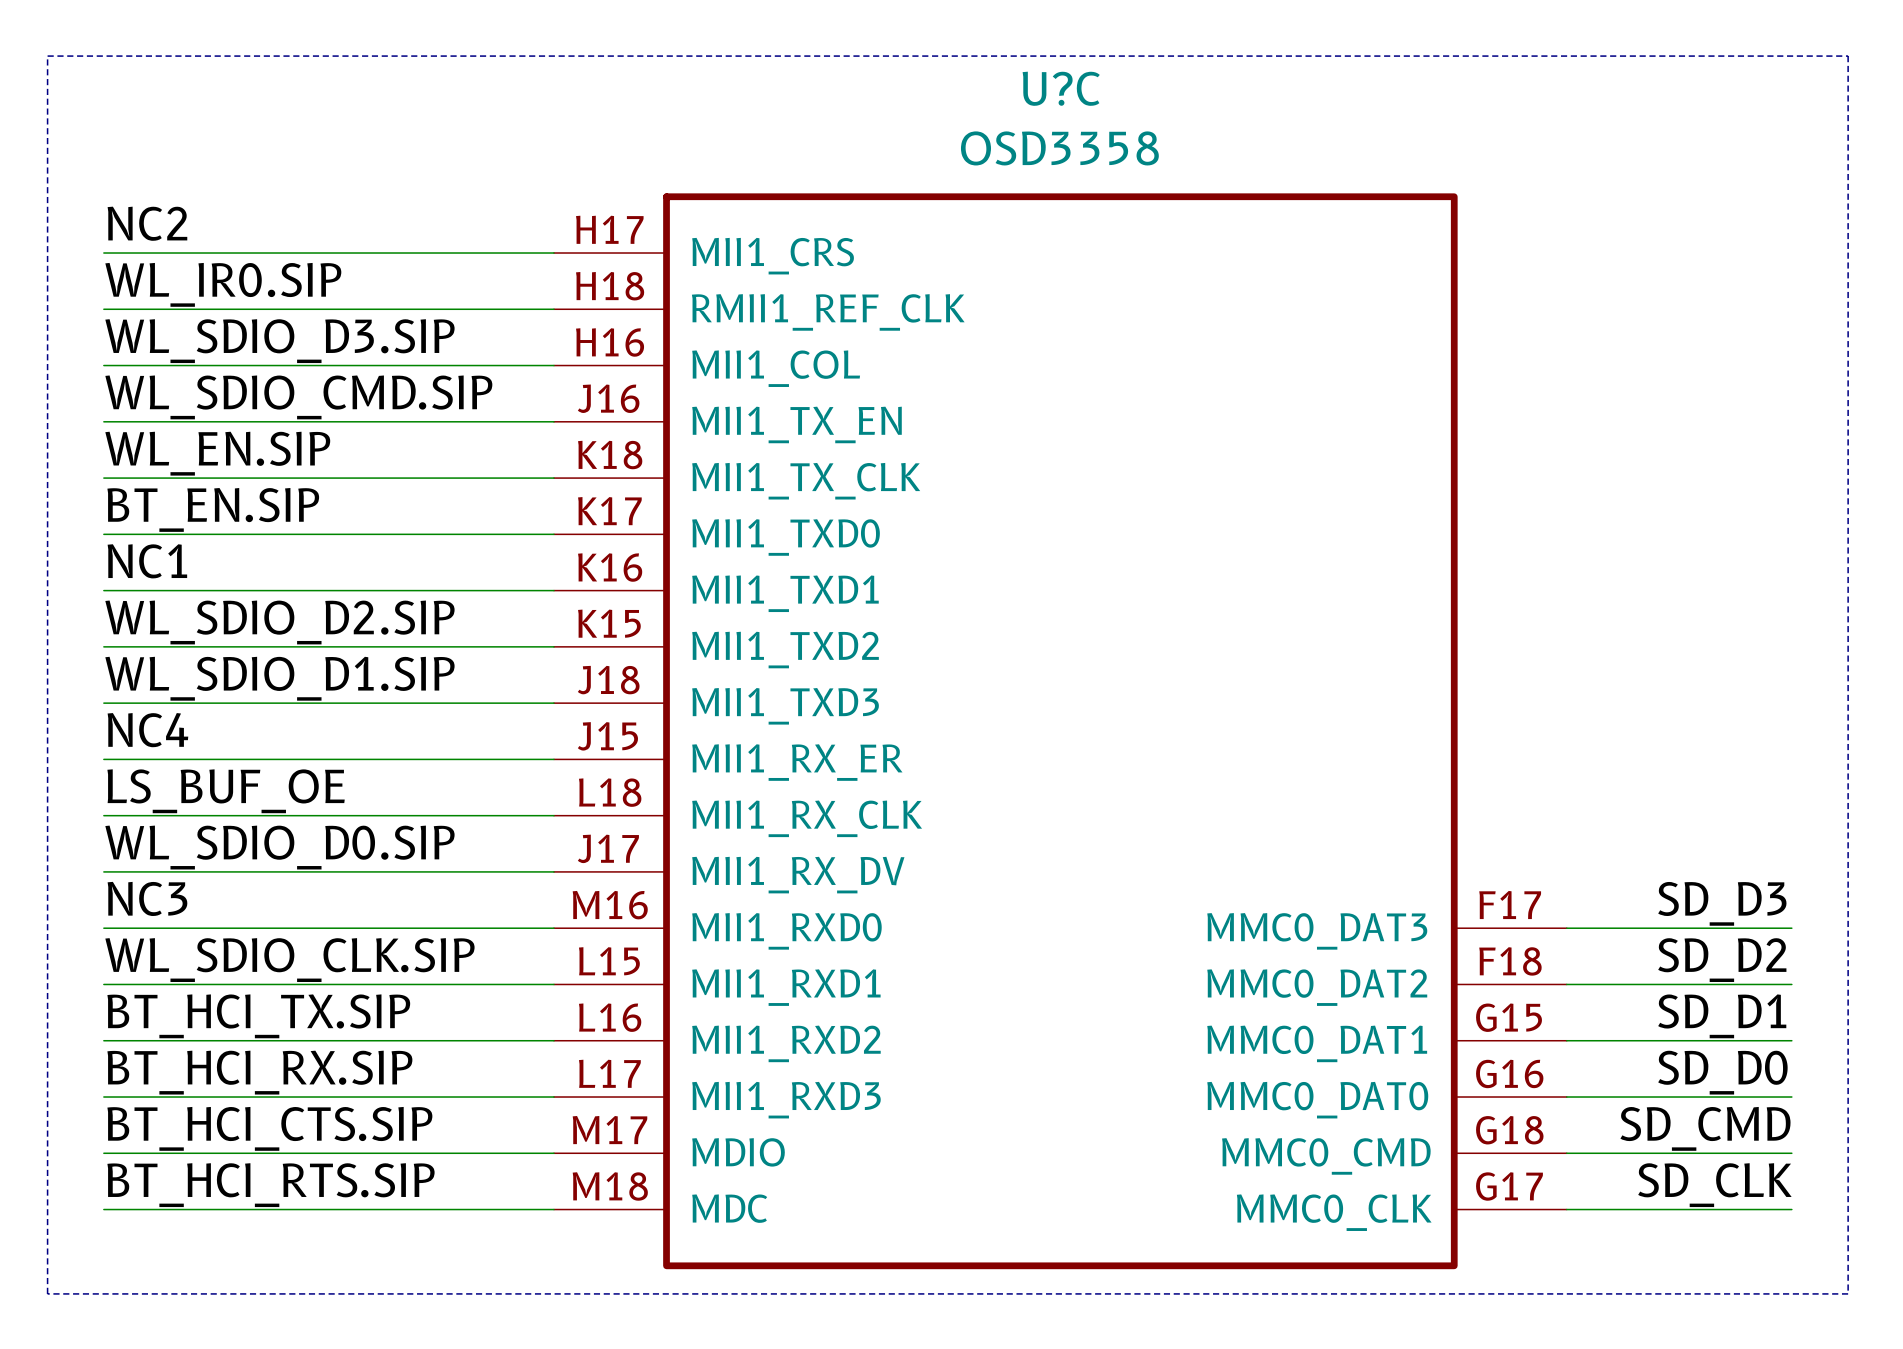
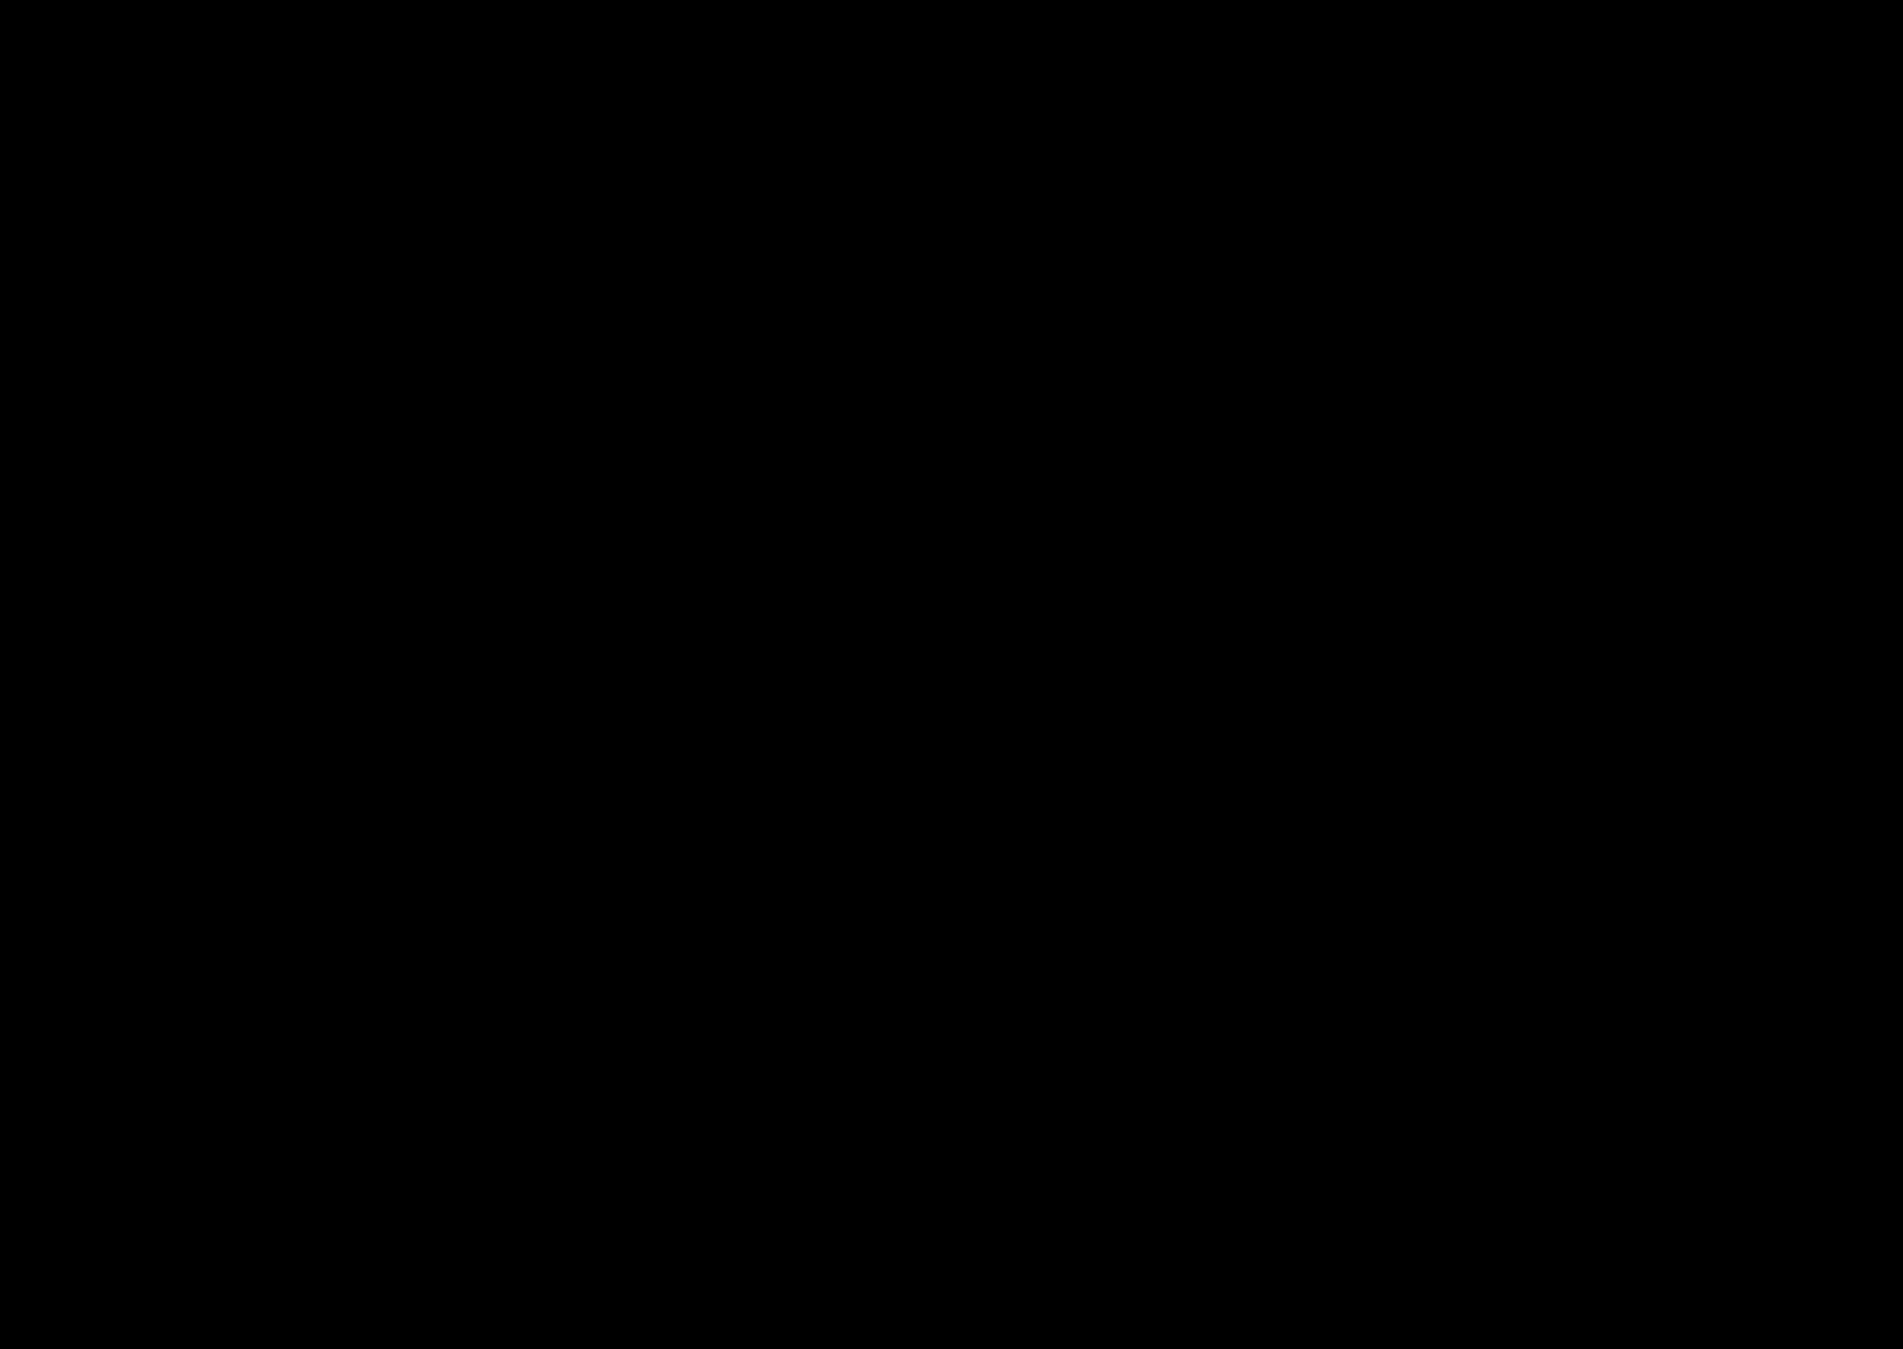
line: (47, 56) (47, 1293) (1848, 1293) (1848, 56) (47, 56) -> none
label: NC2 (147, 223) -> none
wire: (103, 253) (553, 253) -> none
label: WL_IR0.SIP (223, 284) -> none
wire: (103, 309) (553, 309) -> none
label: WL_SDIO_D3.SIP (279, 341) -> none
wire: (103, 365) (553, 365) -> none
label: WL_SDIO_CMD.SIP (298, 397) -> none
wire: (103, 421) (553, 421) -> none
label: WL_EN.SIP (217, 453) -> none
wire: (103, 478) (553, 478) -> none
label: BT_EN.SIP (213, 509) -> none
wire: (103, 534) (553, 534) -> none
label: NC1 (147, 561) -> none
wire: (103, 590) (553, 590) -> none
label: WL_SDIO_D2.SIP (279, 622) -> none
wire: (103, 646) (553, 646) -> none
label: WL_SDIO_D1.SIP (279, 678) -> none
wire: (103, 703) (553, 703) -> none
label: NC4 (147, 730) -> none
U?C: OSD3358 (1060, 731) -> none
wire: (103, 759) (553, 759) -> none
label: LS_BUF_OE (226, 791) -> none
wire: (103, 815) (553, 815) -> none
label: WL_SDIO_D0.SIP (279, 847) -> none
wire: (103, 871) (553, 871) -> none
label: NC3 (147, 898) -> none
label: SD_D3 (1722, 903) -> none
wire: (103, 928) (553, 928) -> none
wire: (1566, 928) (1791, 928) -> none
label: WL_SDIO_CLK.SIP (289, 960) -> none
label: SD_D2 (1722, 960) -> none
wire: (103, 984) (553, 984) -> none
wire: (1566, 984) (1791, 984) -> none
label: BT_HCI_TX.SIP (258, 1016) -> none
label: SD_D1 (1722, 1016) -> none
wire: (103, 1040) (553, 1040) -> none
wire: (1566, 1040) (1791, 1040) -> none
label: BT_HCI_RX.SIP (259, 1072) -> none
label: SD_D0 (1722, 1072) -> none
wire: (103, 1097) (553, 1097) -> none
wire: (1566, 1097) (1791, 1097) -> none
label: BT_HCI_CTS.SIP (269, 1128) -> none
label: SD_CMD (1705, 1128) -> none
wire: (103, 1153) (553, 1153) -> none
wire: (1566, 1153) (1791, 1153) -> none
label: BT_HCI_RTS.SIP (270, 1185) -> none
label: SD_CLK (1714, 1185) -> none
wire: (103, 1209) (553, 1209) -> none
wire: (1566, 1209) (1791, 1209) -> none

